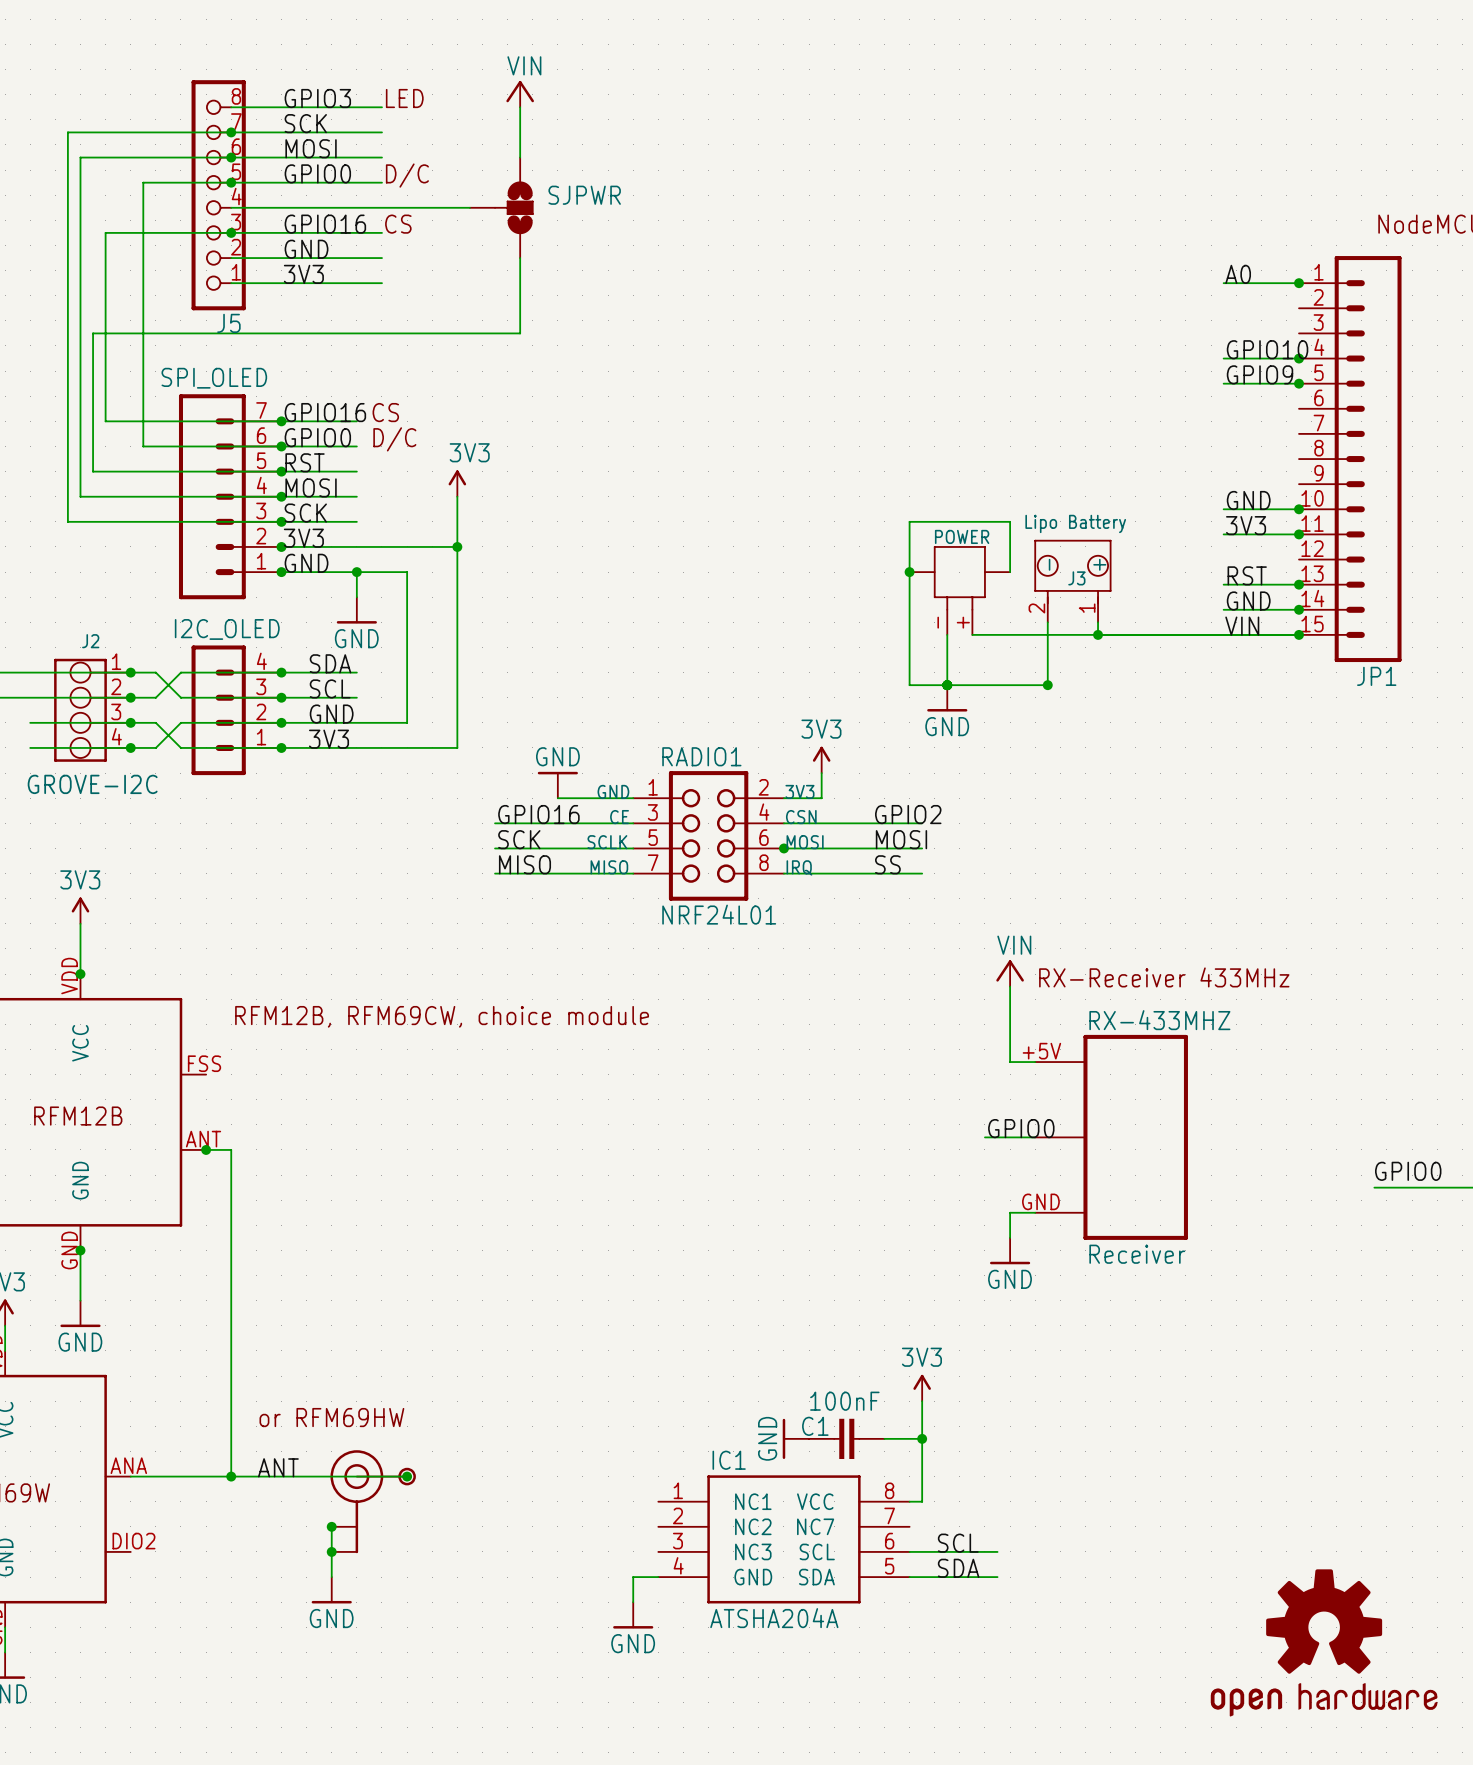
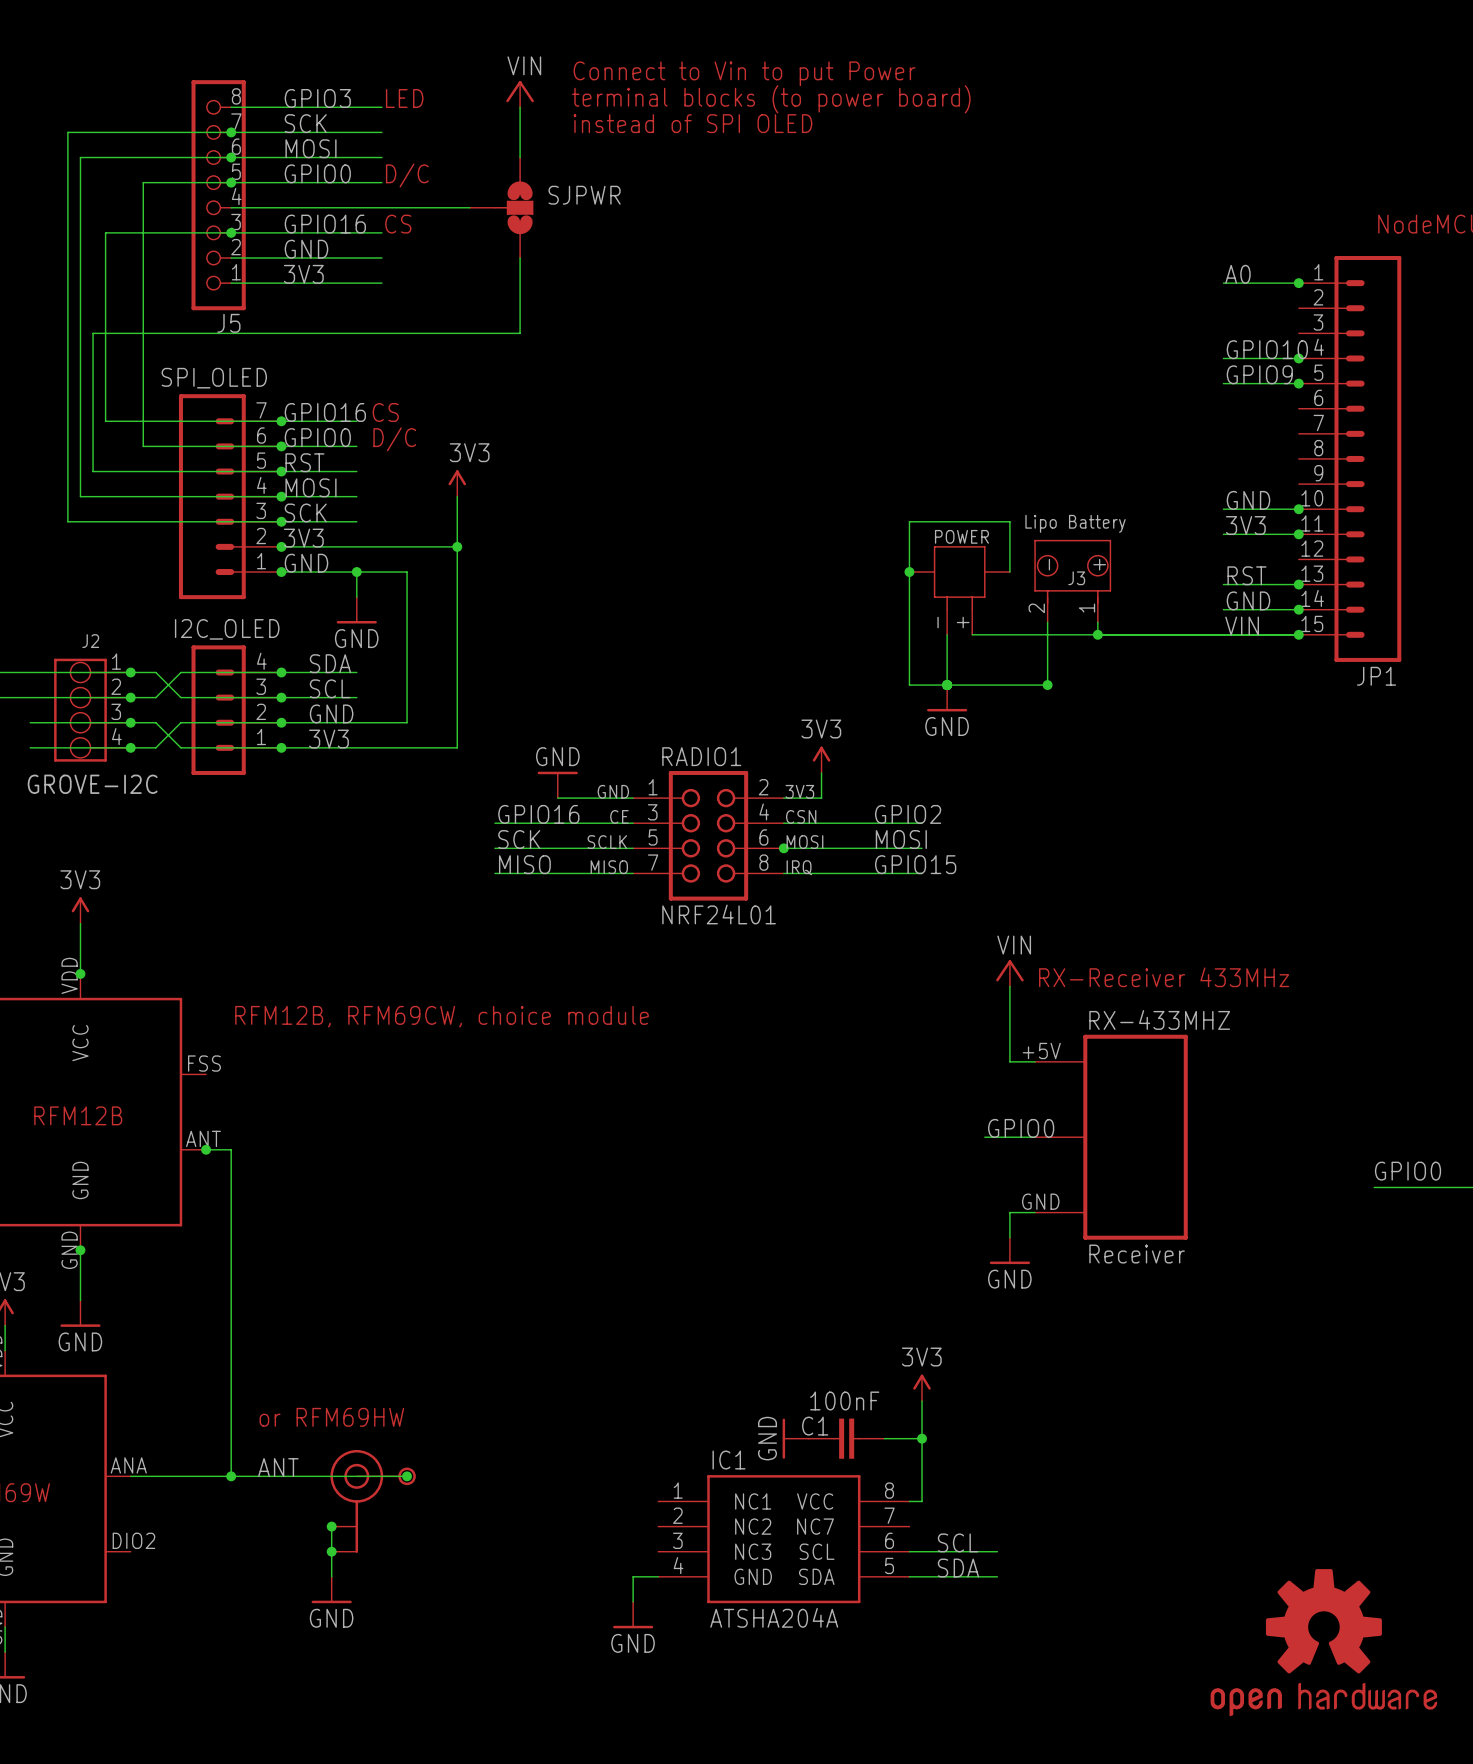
text: none -> Connect to Vin to put Power (744, 73)
text: none -> terminal blocks (to power board) (771, 99)
text: none -> instead of SPI OLED (692, 123)
label: SS (887, 864) -> GPIO15 (915, 864)

